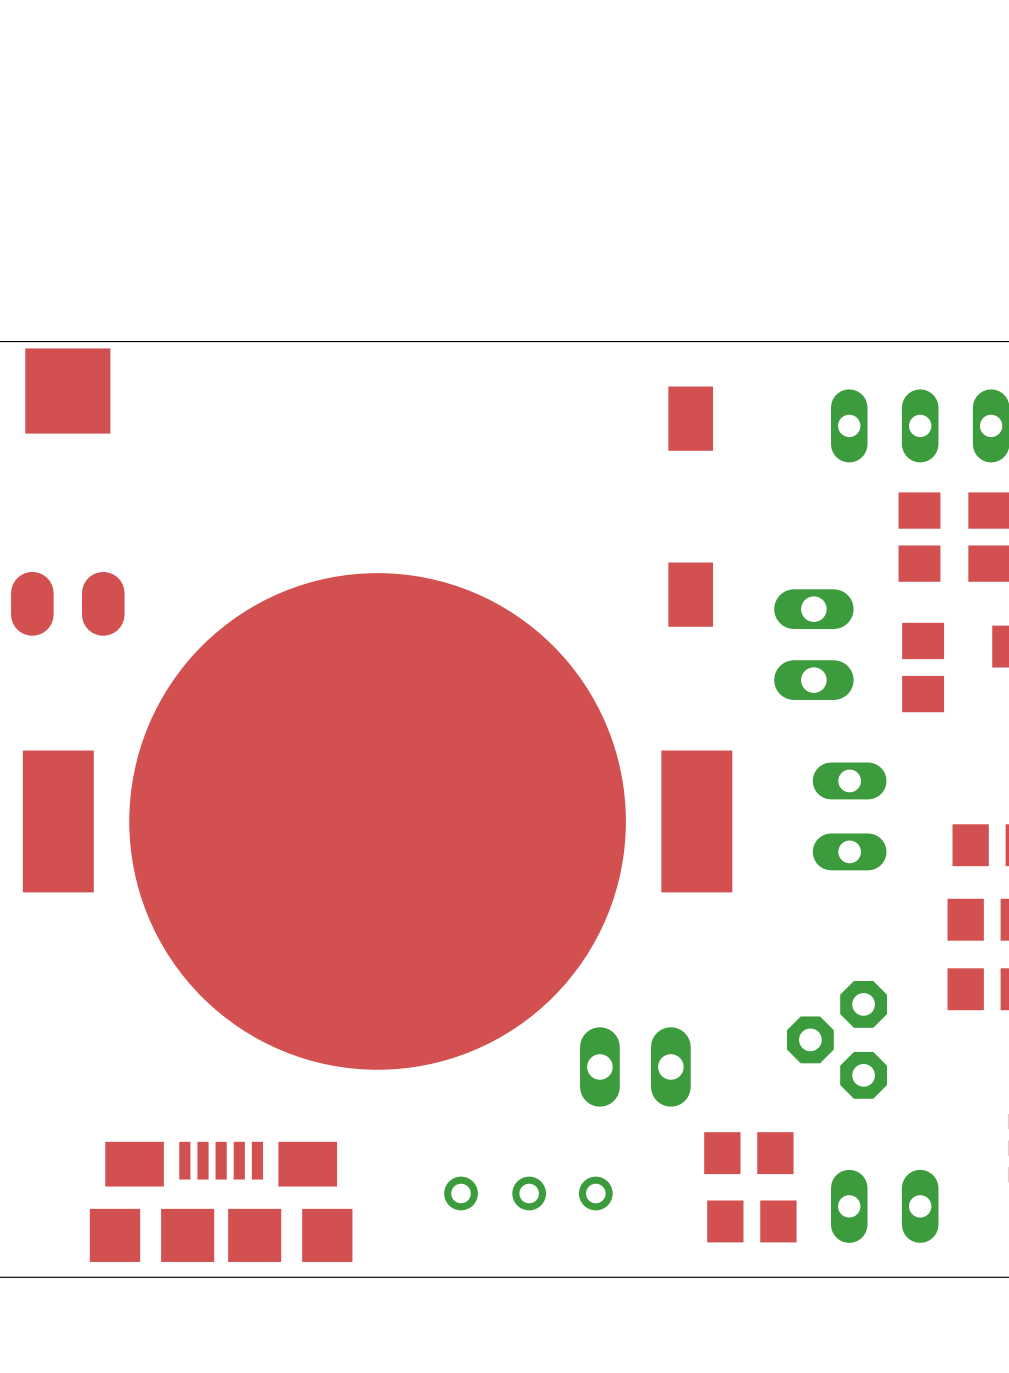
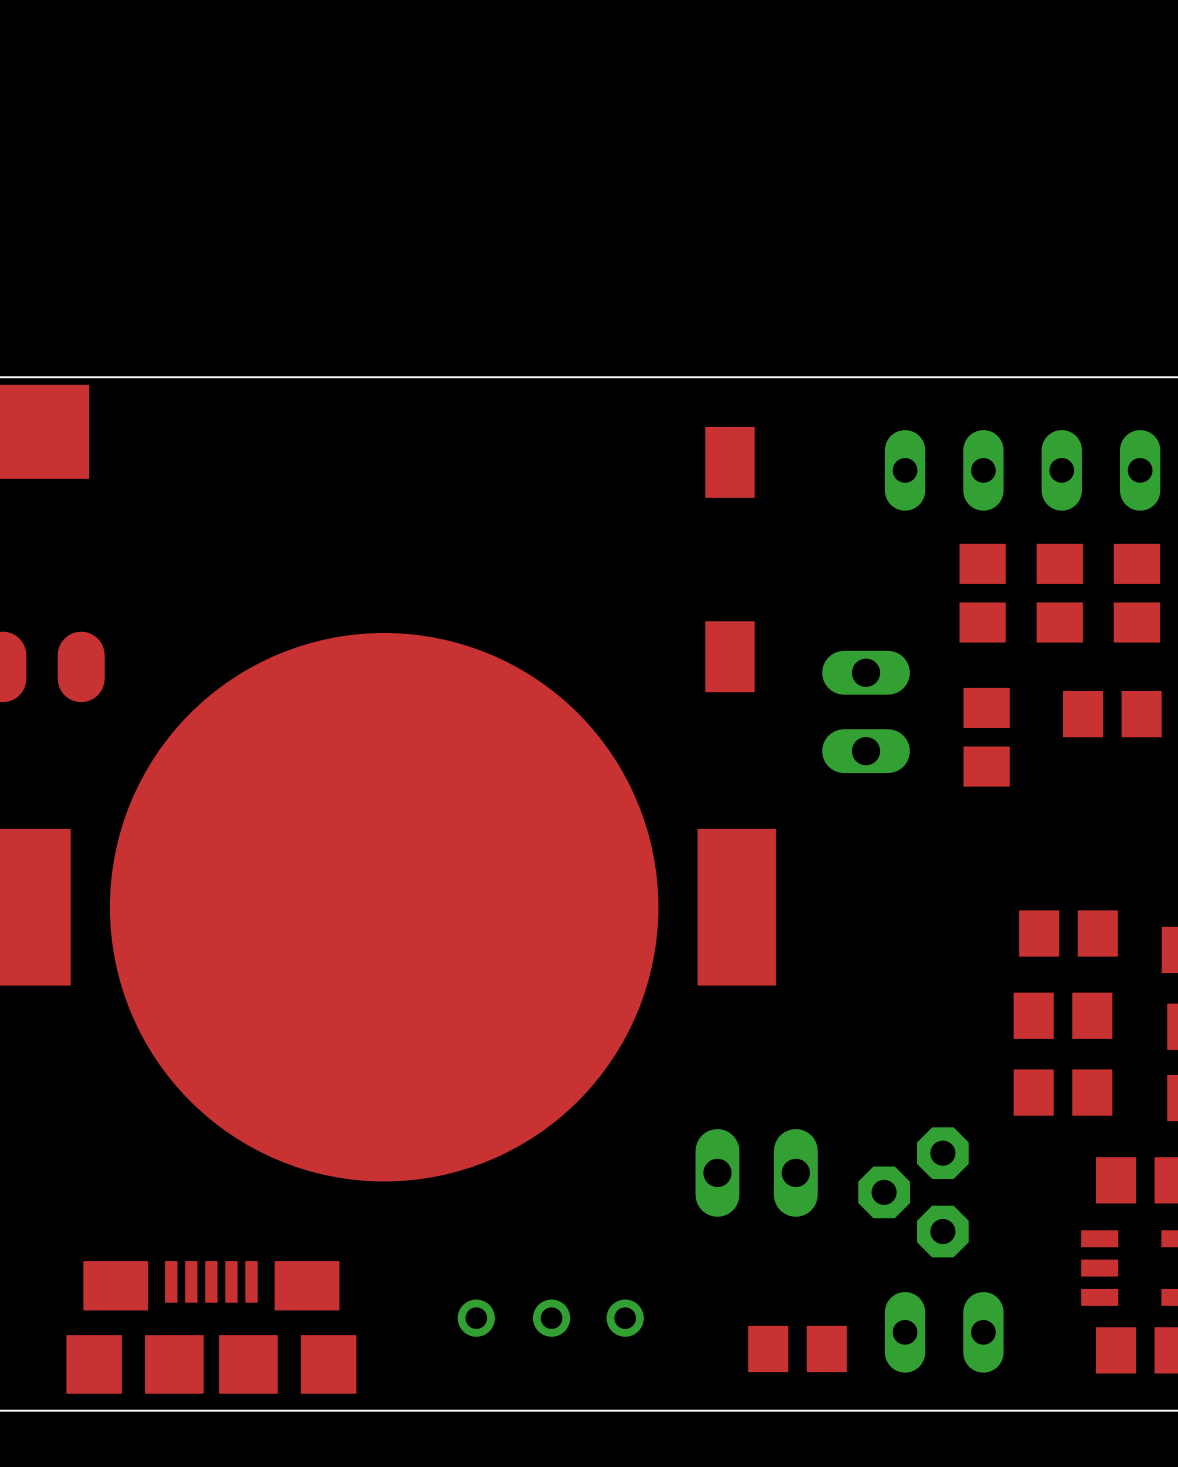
part: (849, 816) -> none
part position: (836, 1039) -> (913, 1192)
part position: (635, 1066) -> (756, 1172)
part: (748, 1153) -> none

